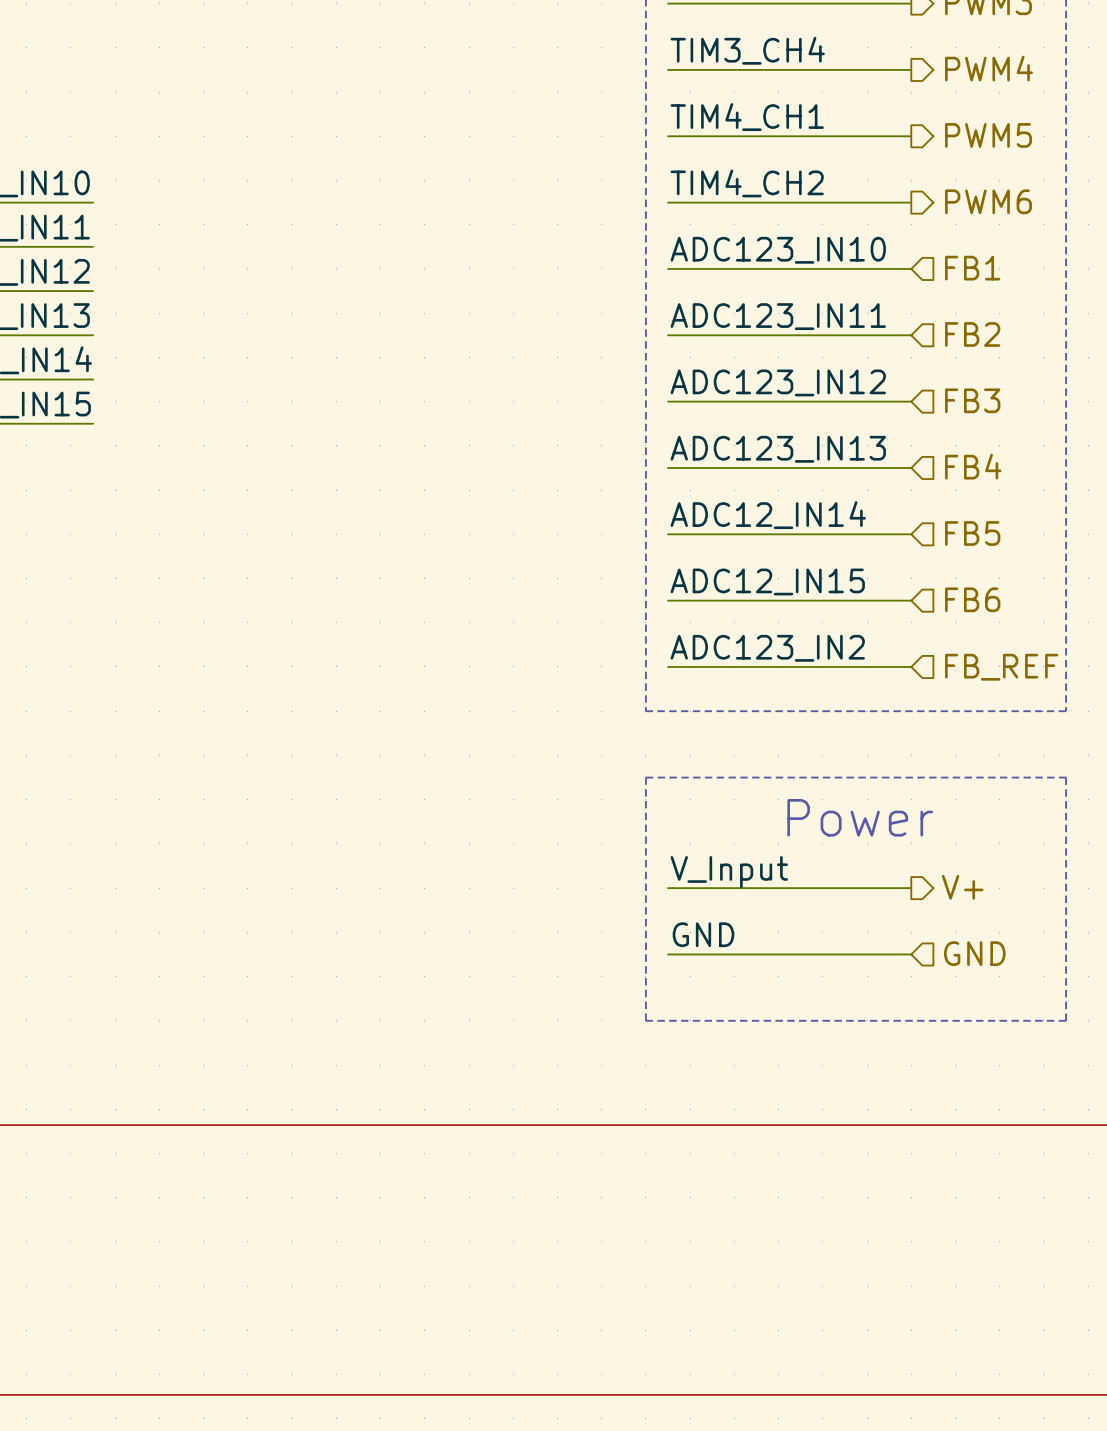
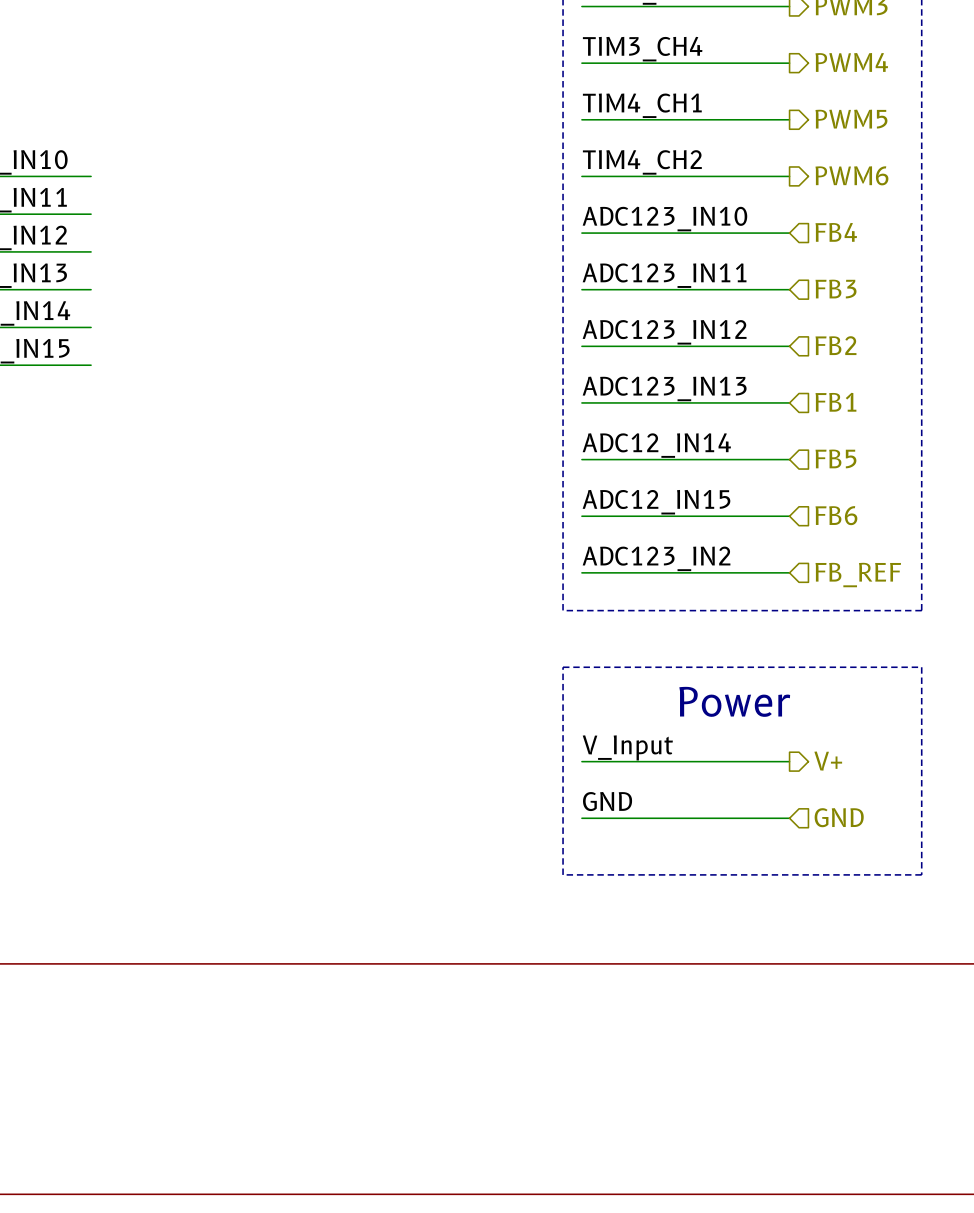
hierarchical label: FB1 (972, 268) -> FB4 (836, 232)
hierarchical label: FB2 (972, 334) -> FB3 (836, 289)
hierarchical label: FB3 (972, 400) -> FB2 (836, 345)
hierarchical label: FB4 (973, 466) -> FB1 (835, 402)

